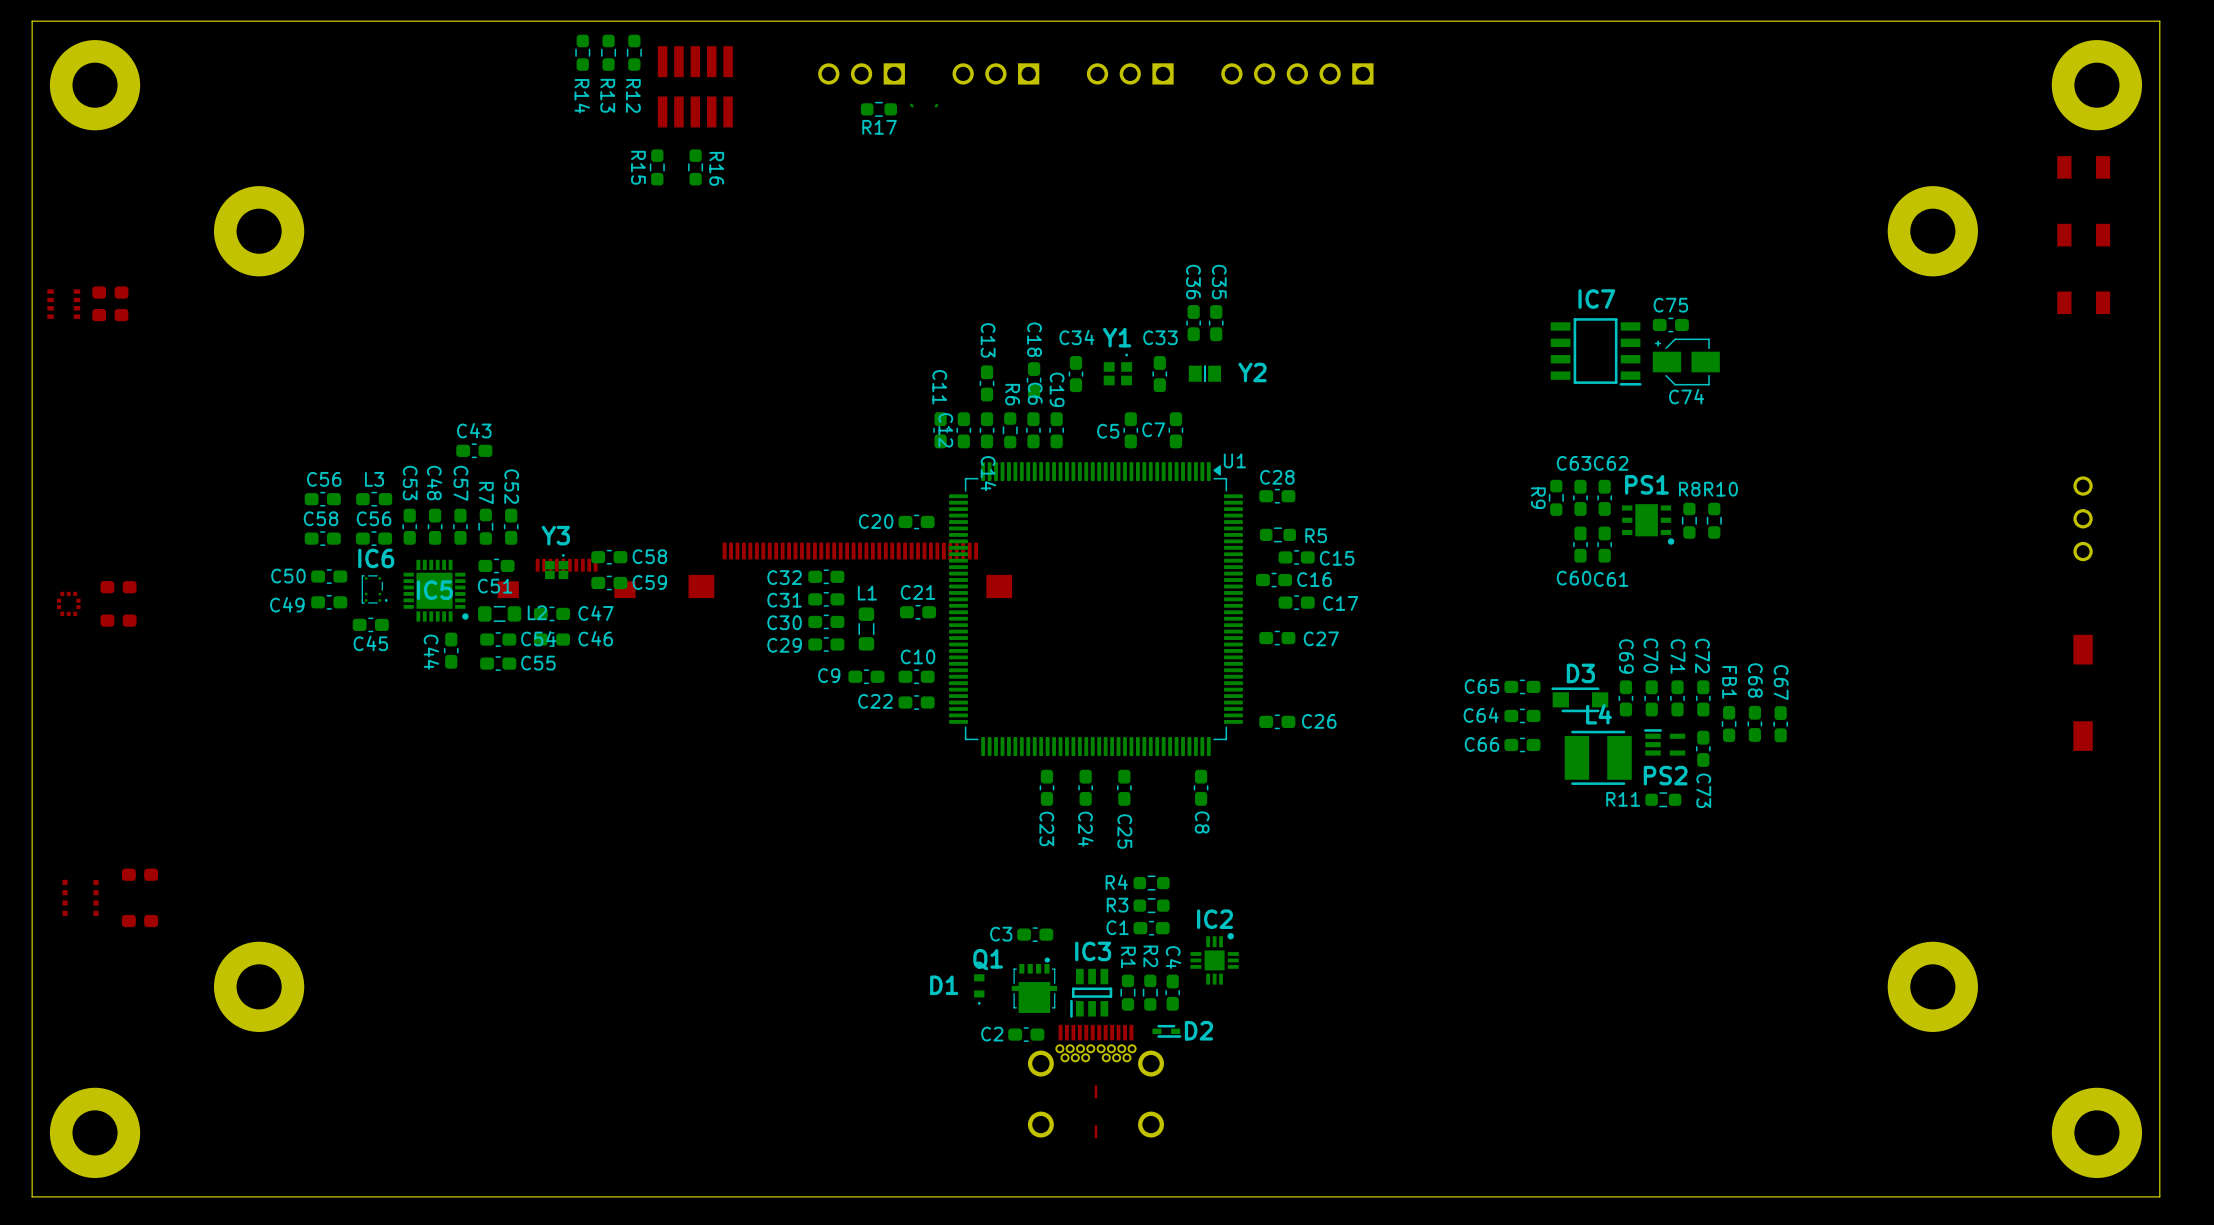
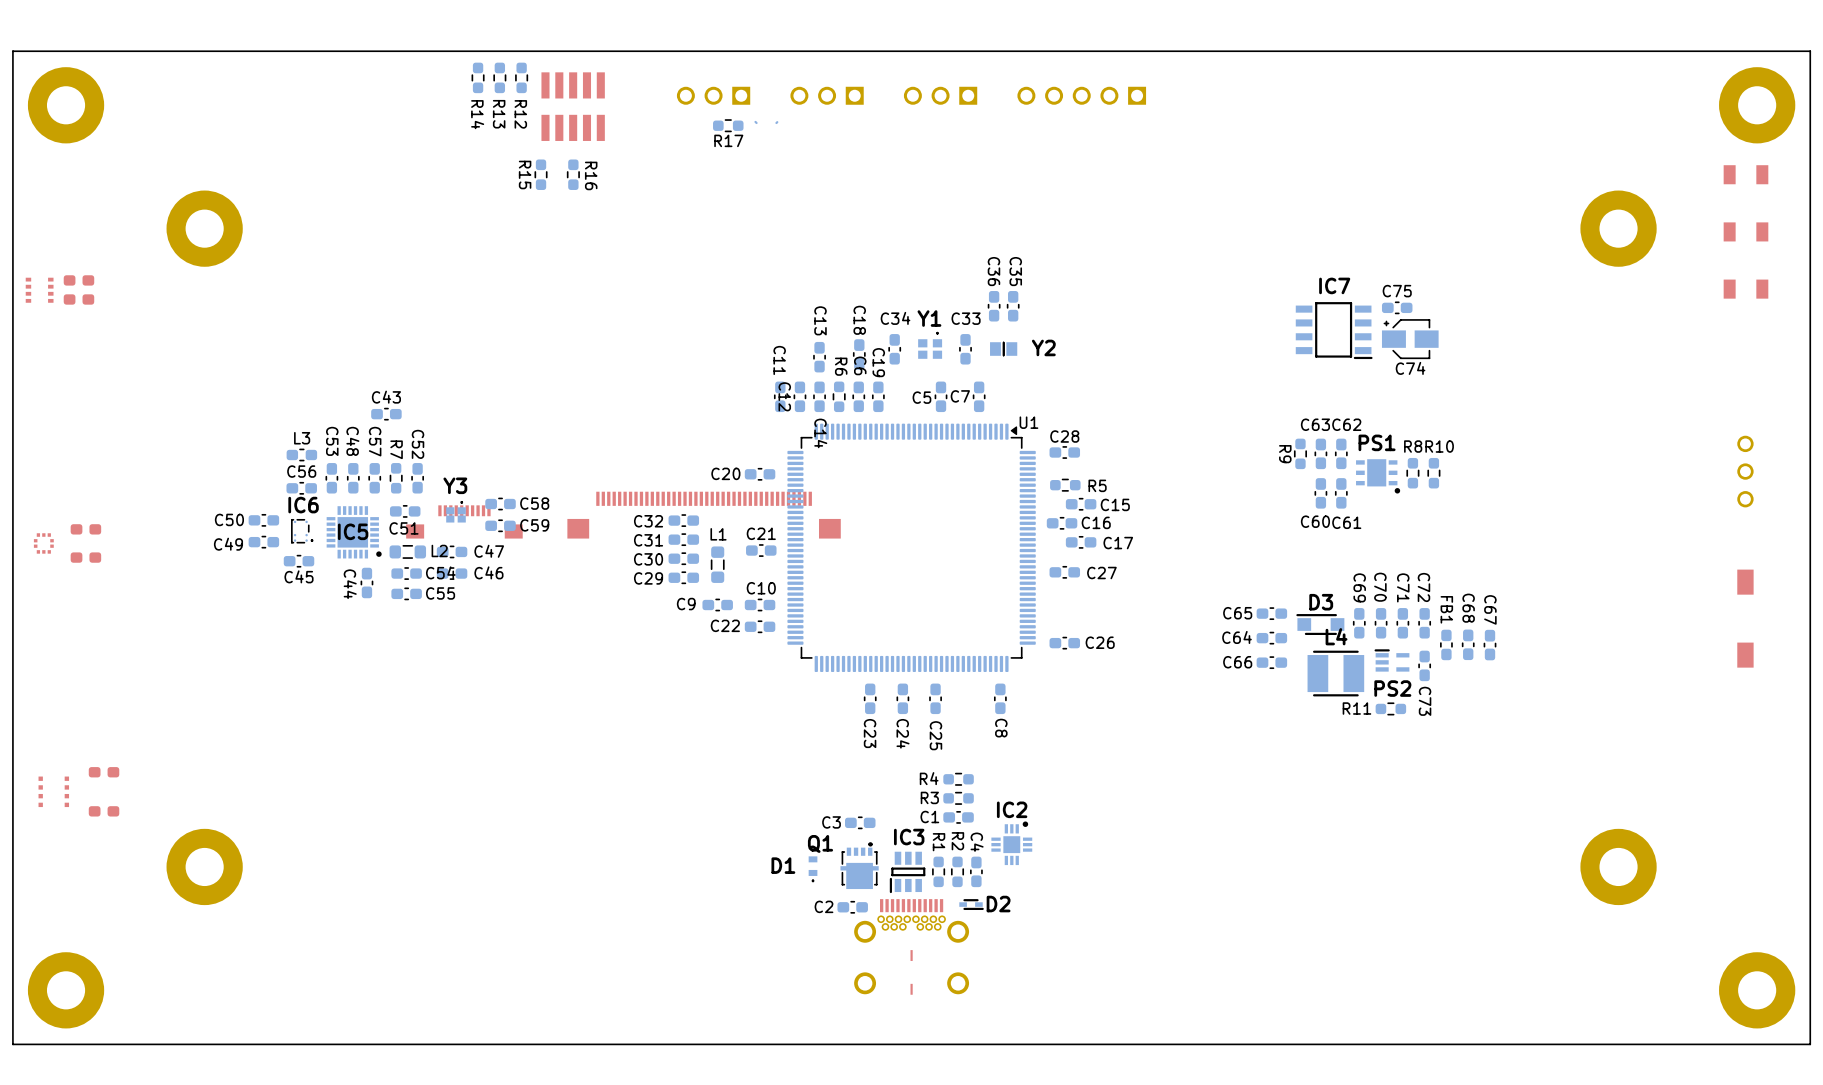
C56: (322, 499) -> none
C58: (322, 538) -> none

